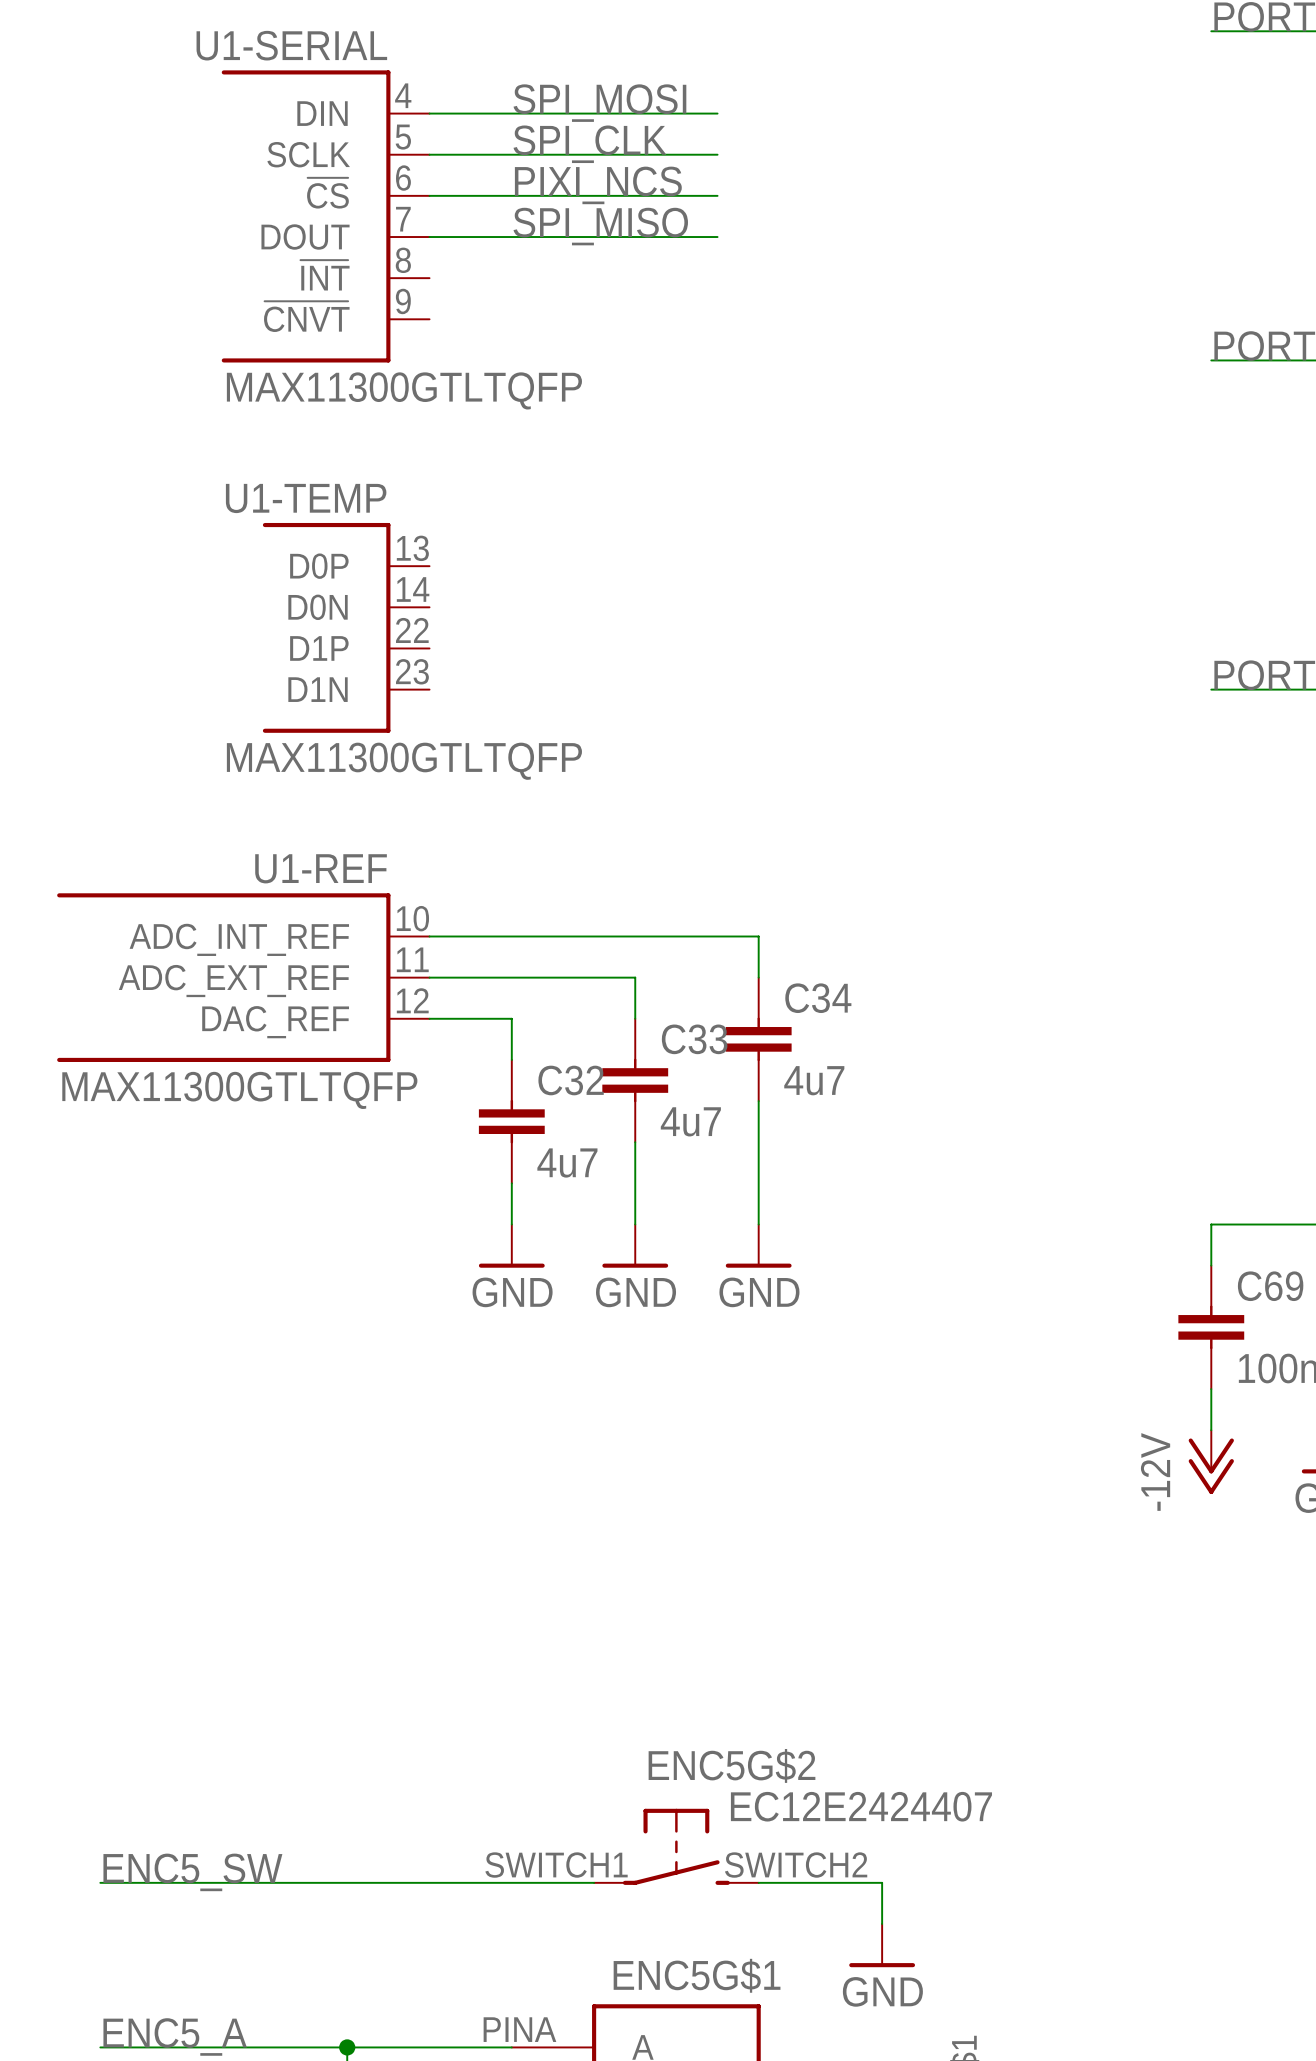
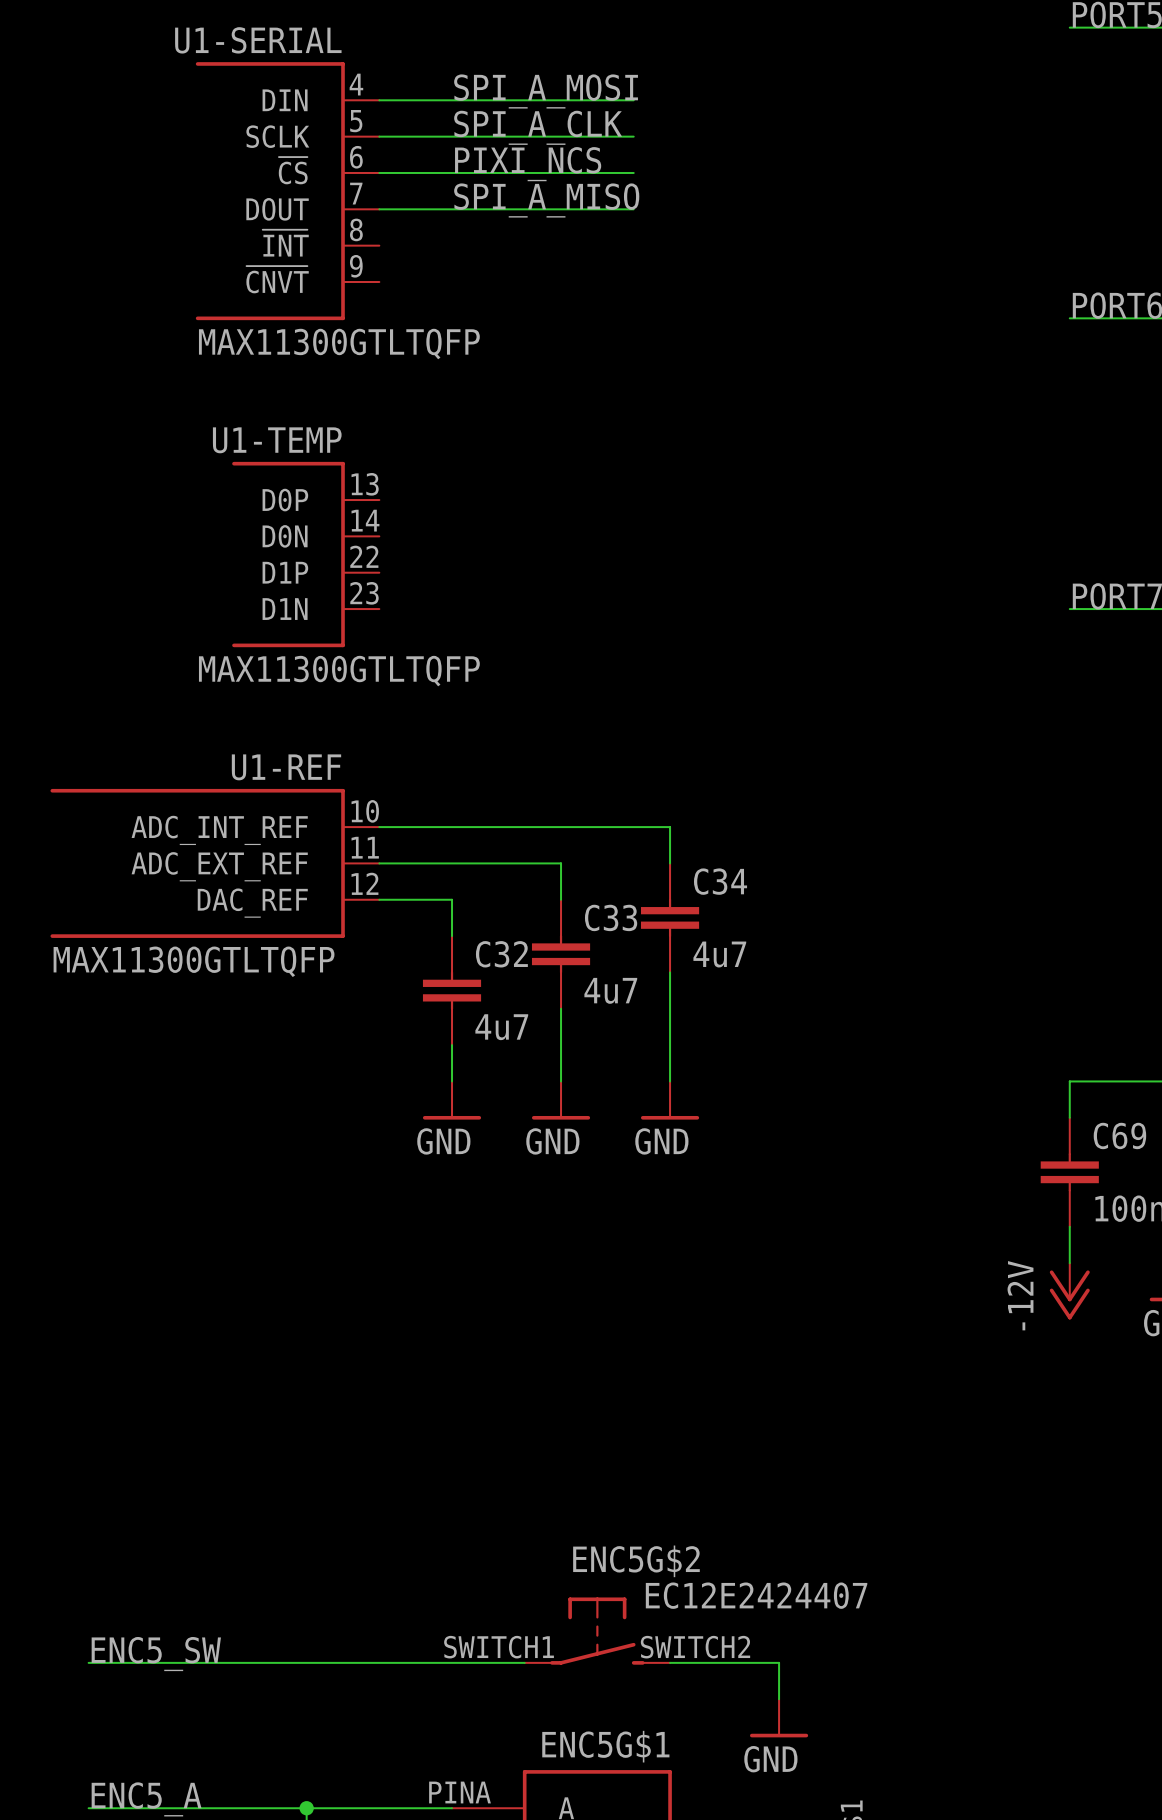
label: SPI_MOSI (599, 103) -> SPI_A_MOSI (546, 91)
label: SPI_CLK (589, 144) -> SPI_A_CLK (538, 127)
label: SPI_MISO (600, 226) -> SPI_A_MISO (546, 200)

